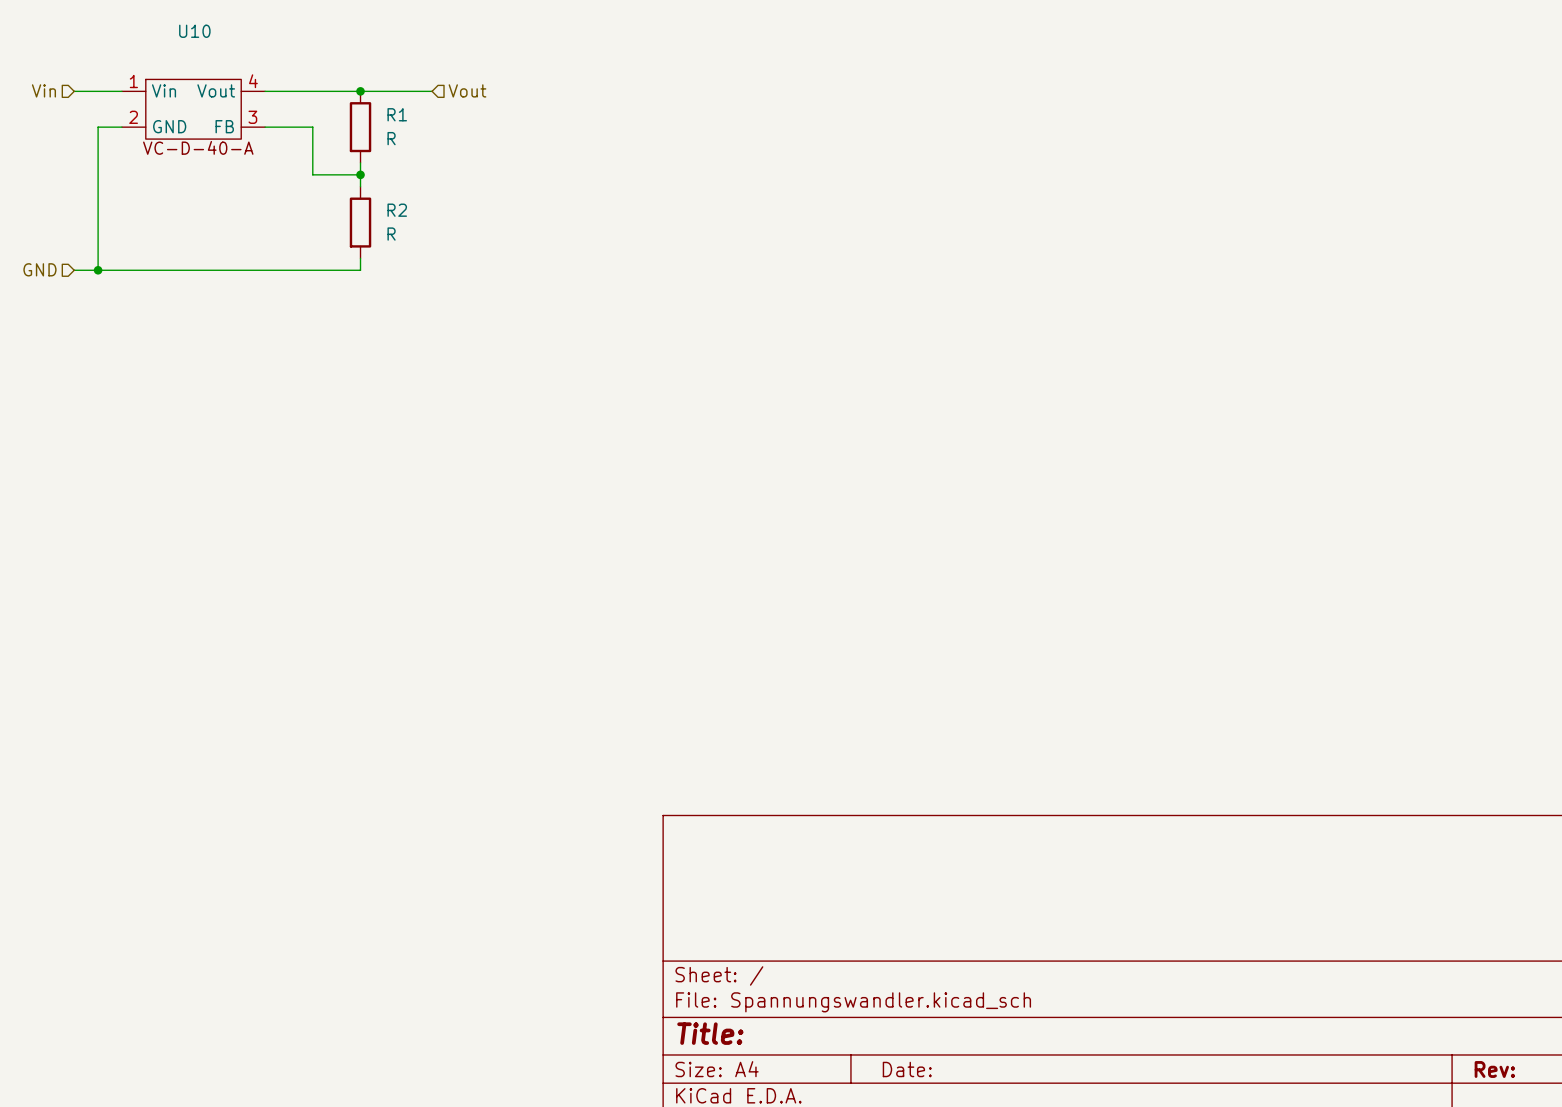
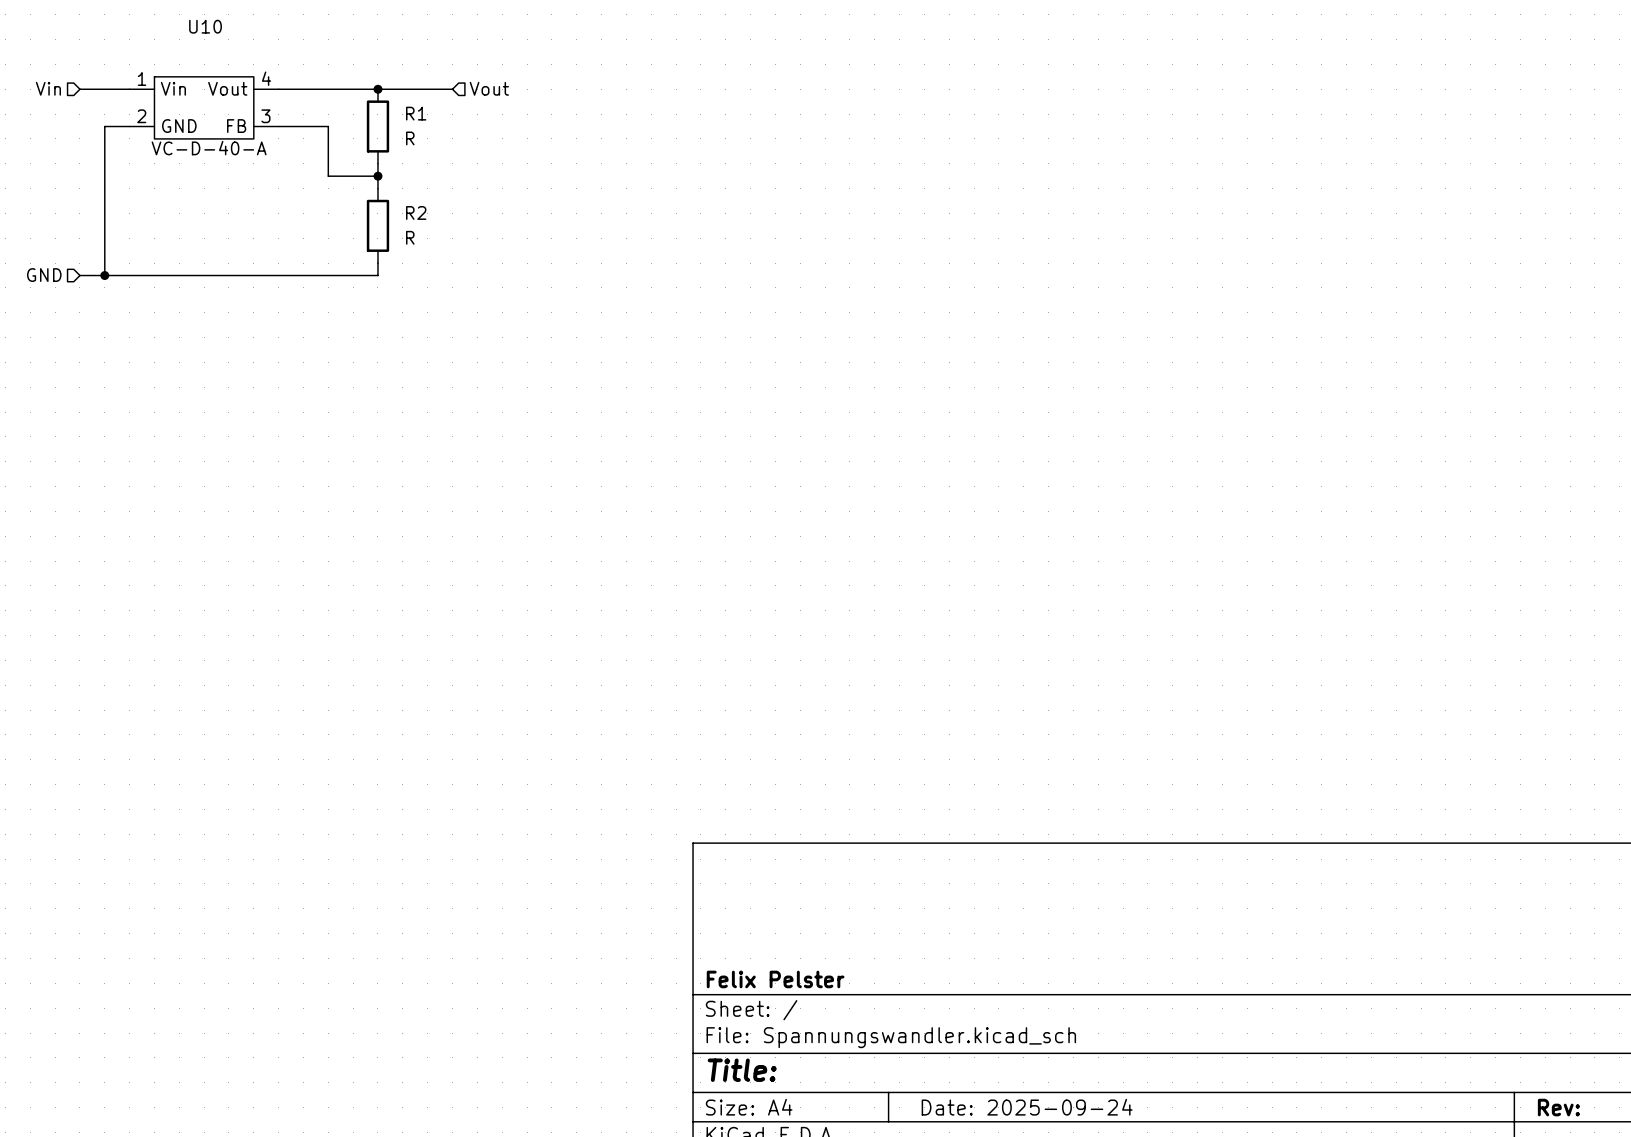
title block: none -> Felix Pelster (775, 979)
title block: Date: (907, 1069) -> Date: 2025-09-24 (1027, 1107)

